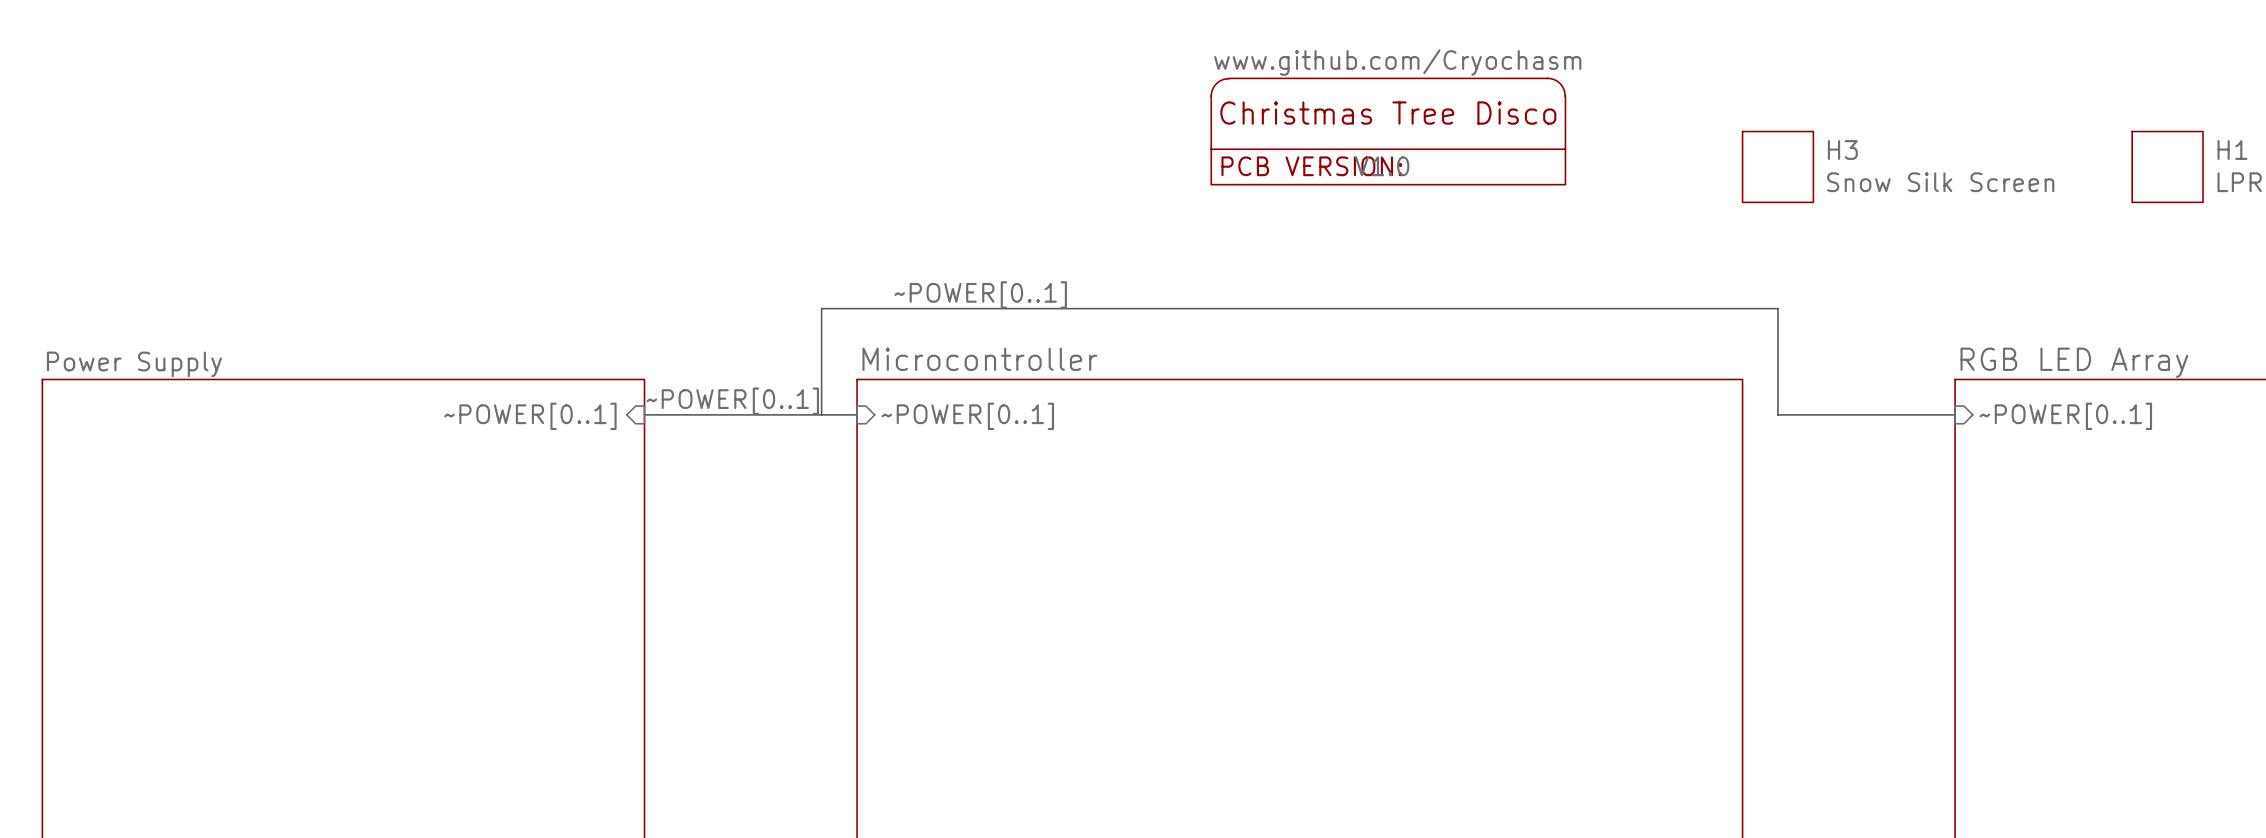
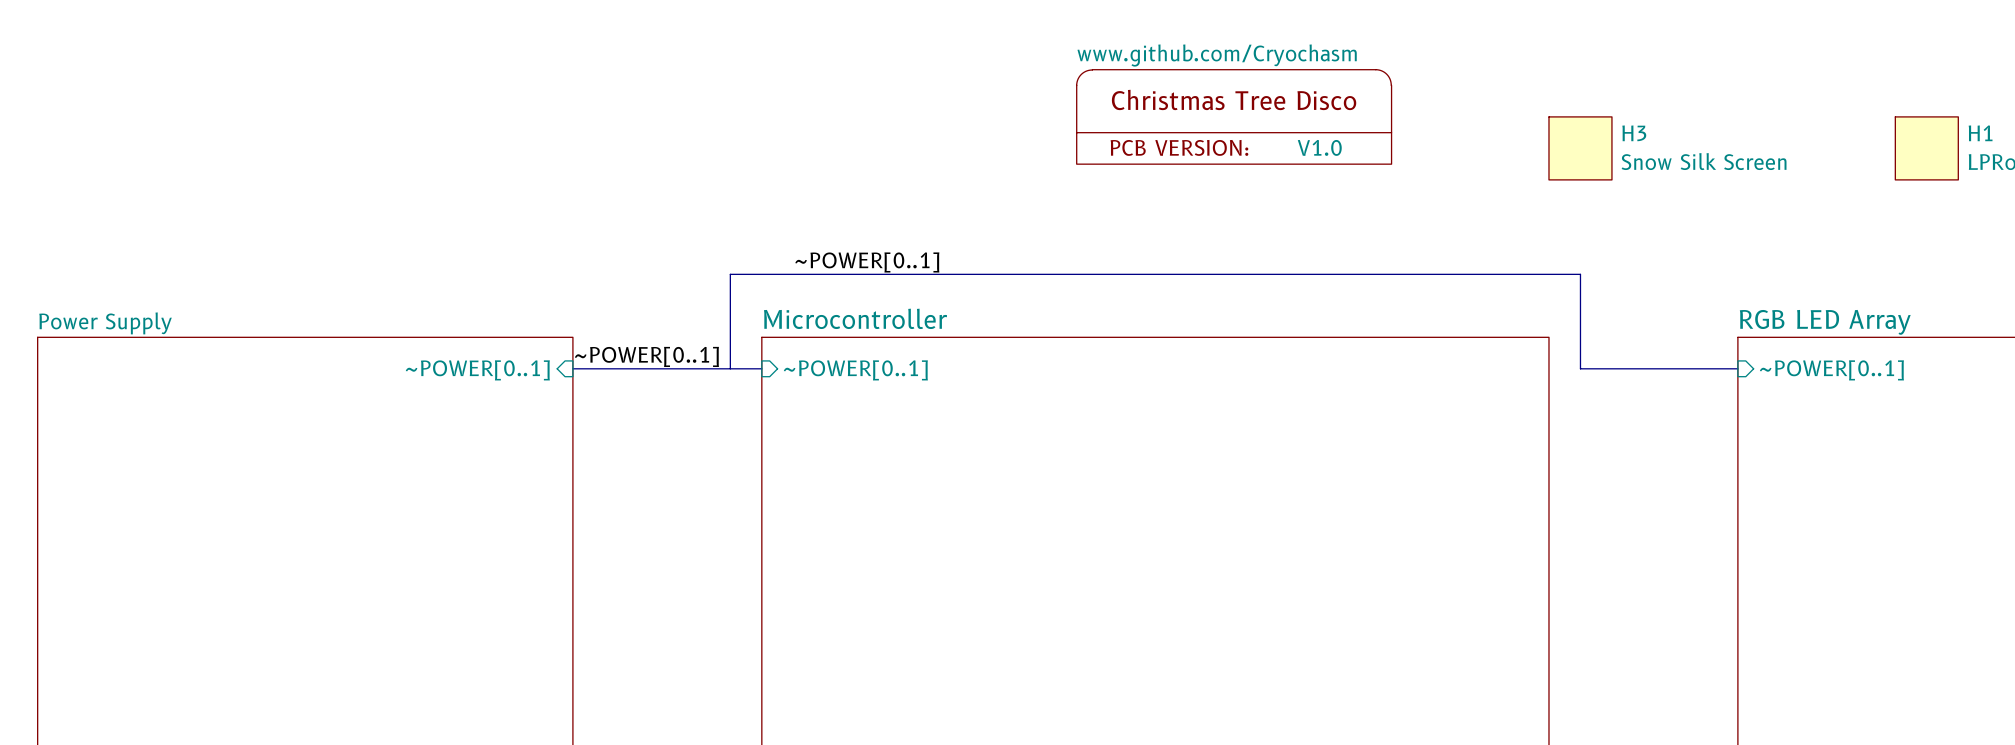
V1.0 name position: V1.0 (1382, 166) -> V1.0 (1319, 147)

